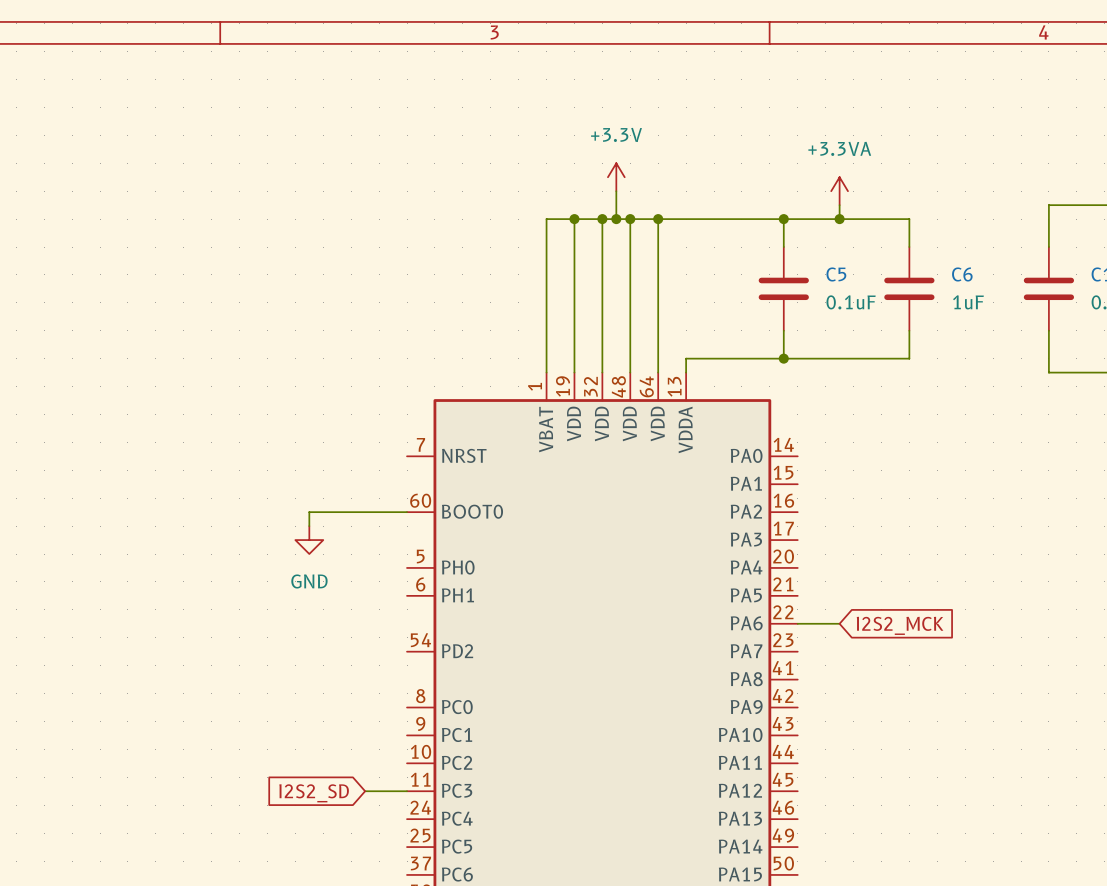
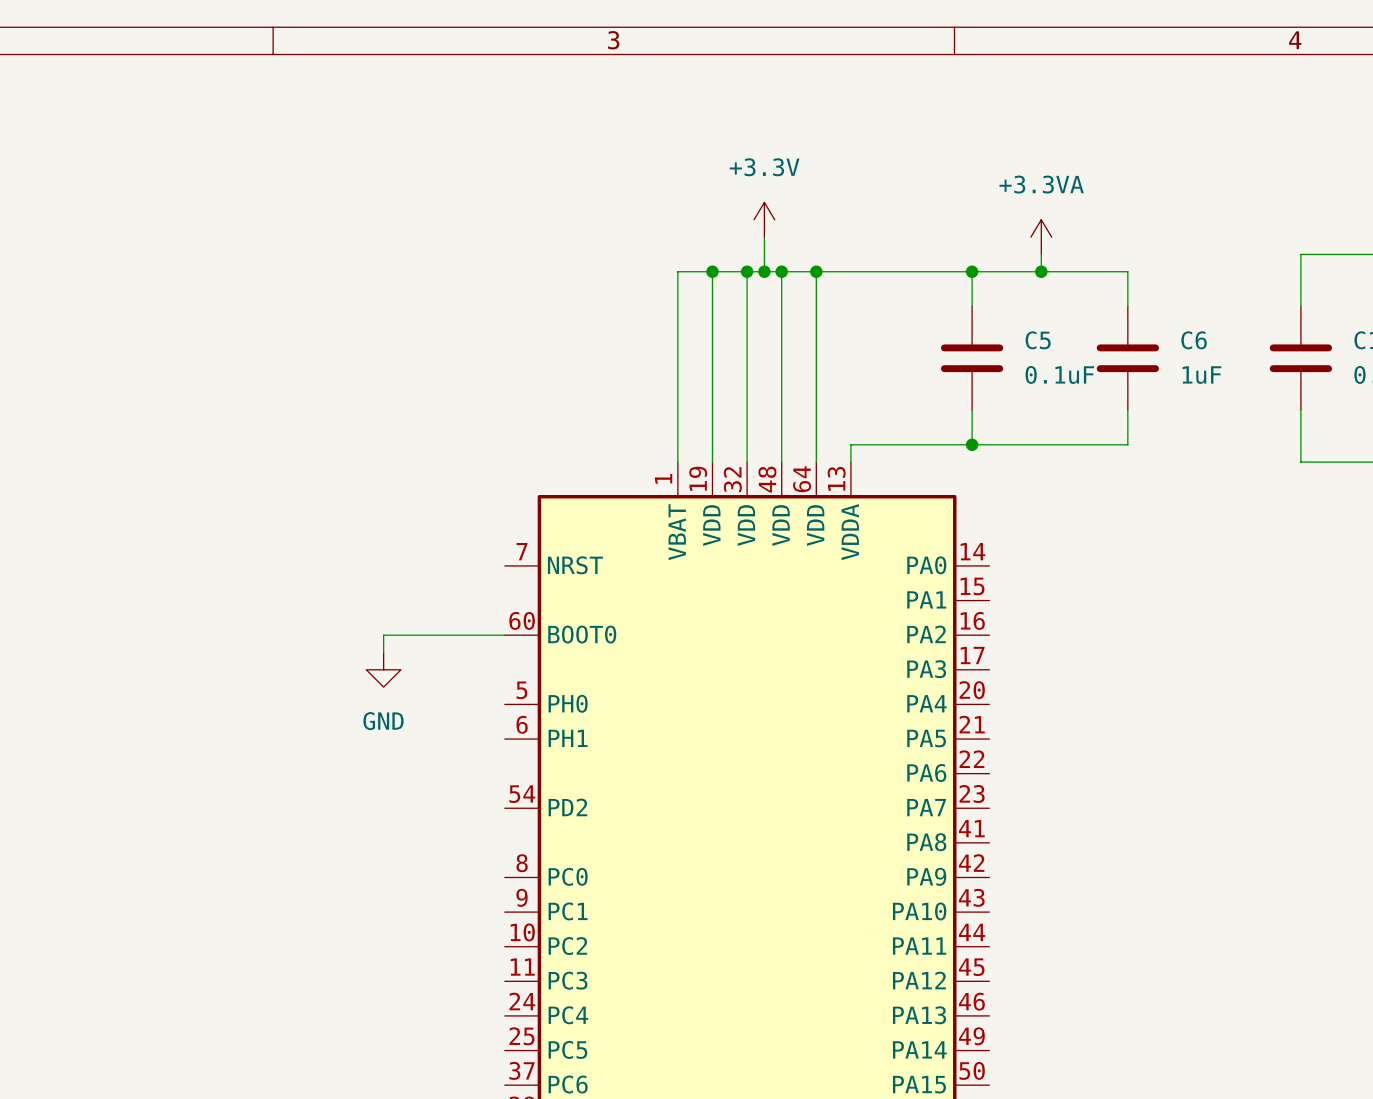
wire: (797, 623) (839, 623) -> none
global label: I2S2_MCK (900, 625) -> none
wire: (365, 791) (407, 791) -> none
global label: I2S2_SD (314, 793) -> none

